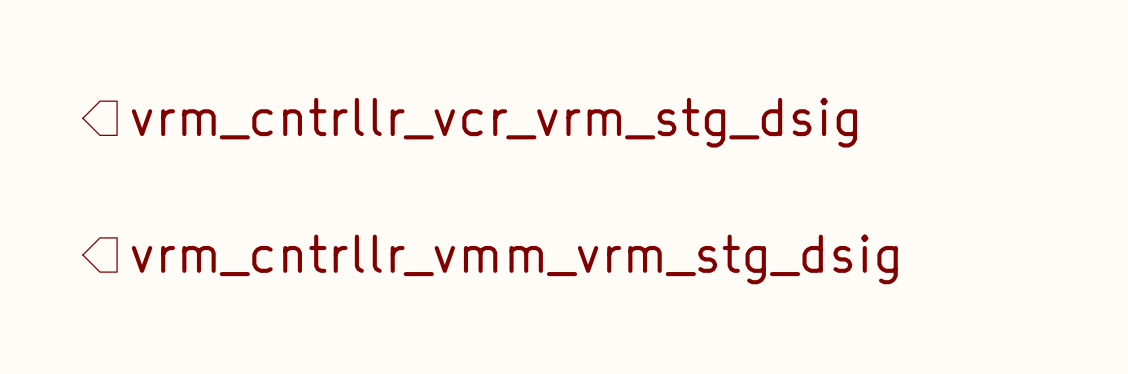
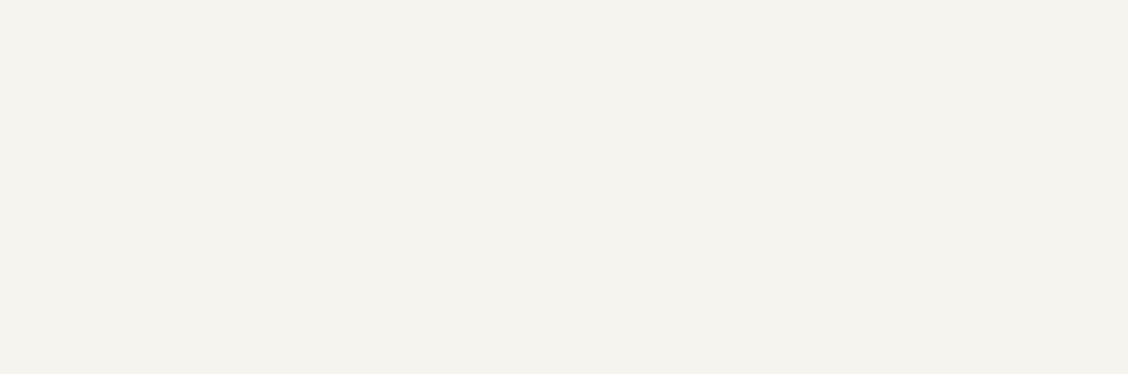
hierarchical label: vrm_cntrllr_vcr_vrm_stg_dsig (494, 122) -> none
hierarchical label: vrm_cntrllr_vmm_vrm_stg_dsig (514, 259) -> none

